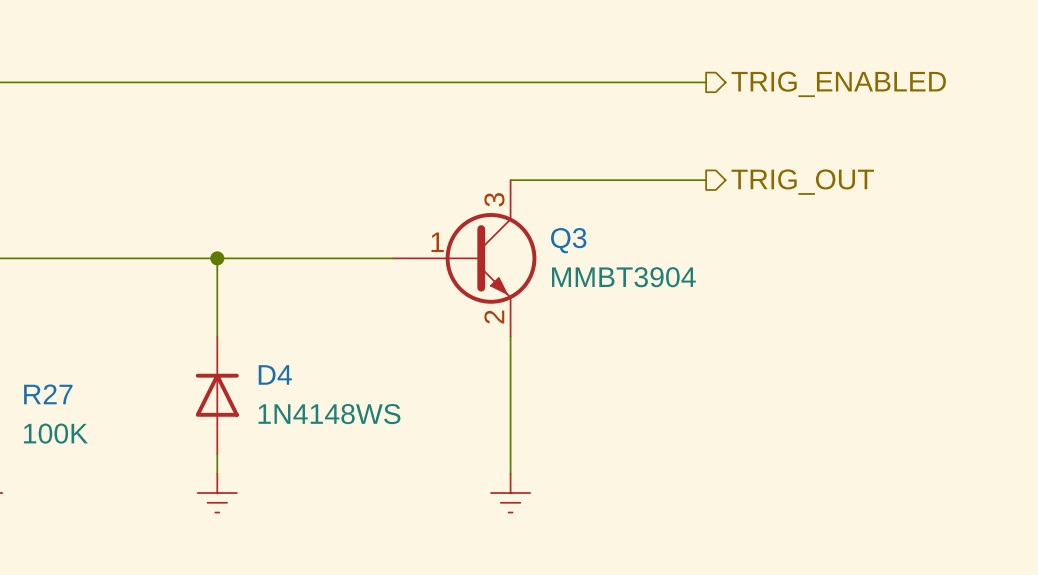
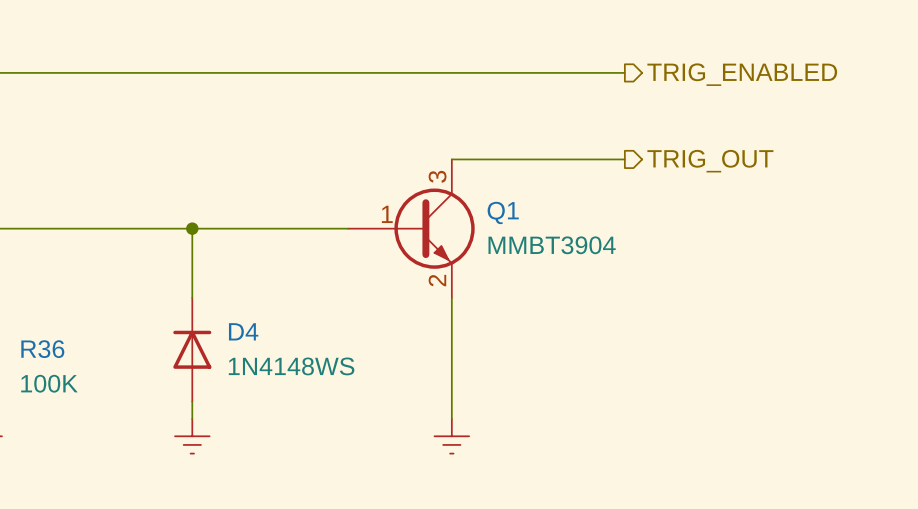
Q3 name: Q3 (568, 240) -> Q1 (503, 212)
R27 name: R27 (48, 394) -> R36 (42, 349)

